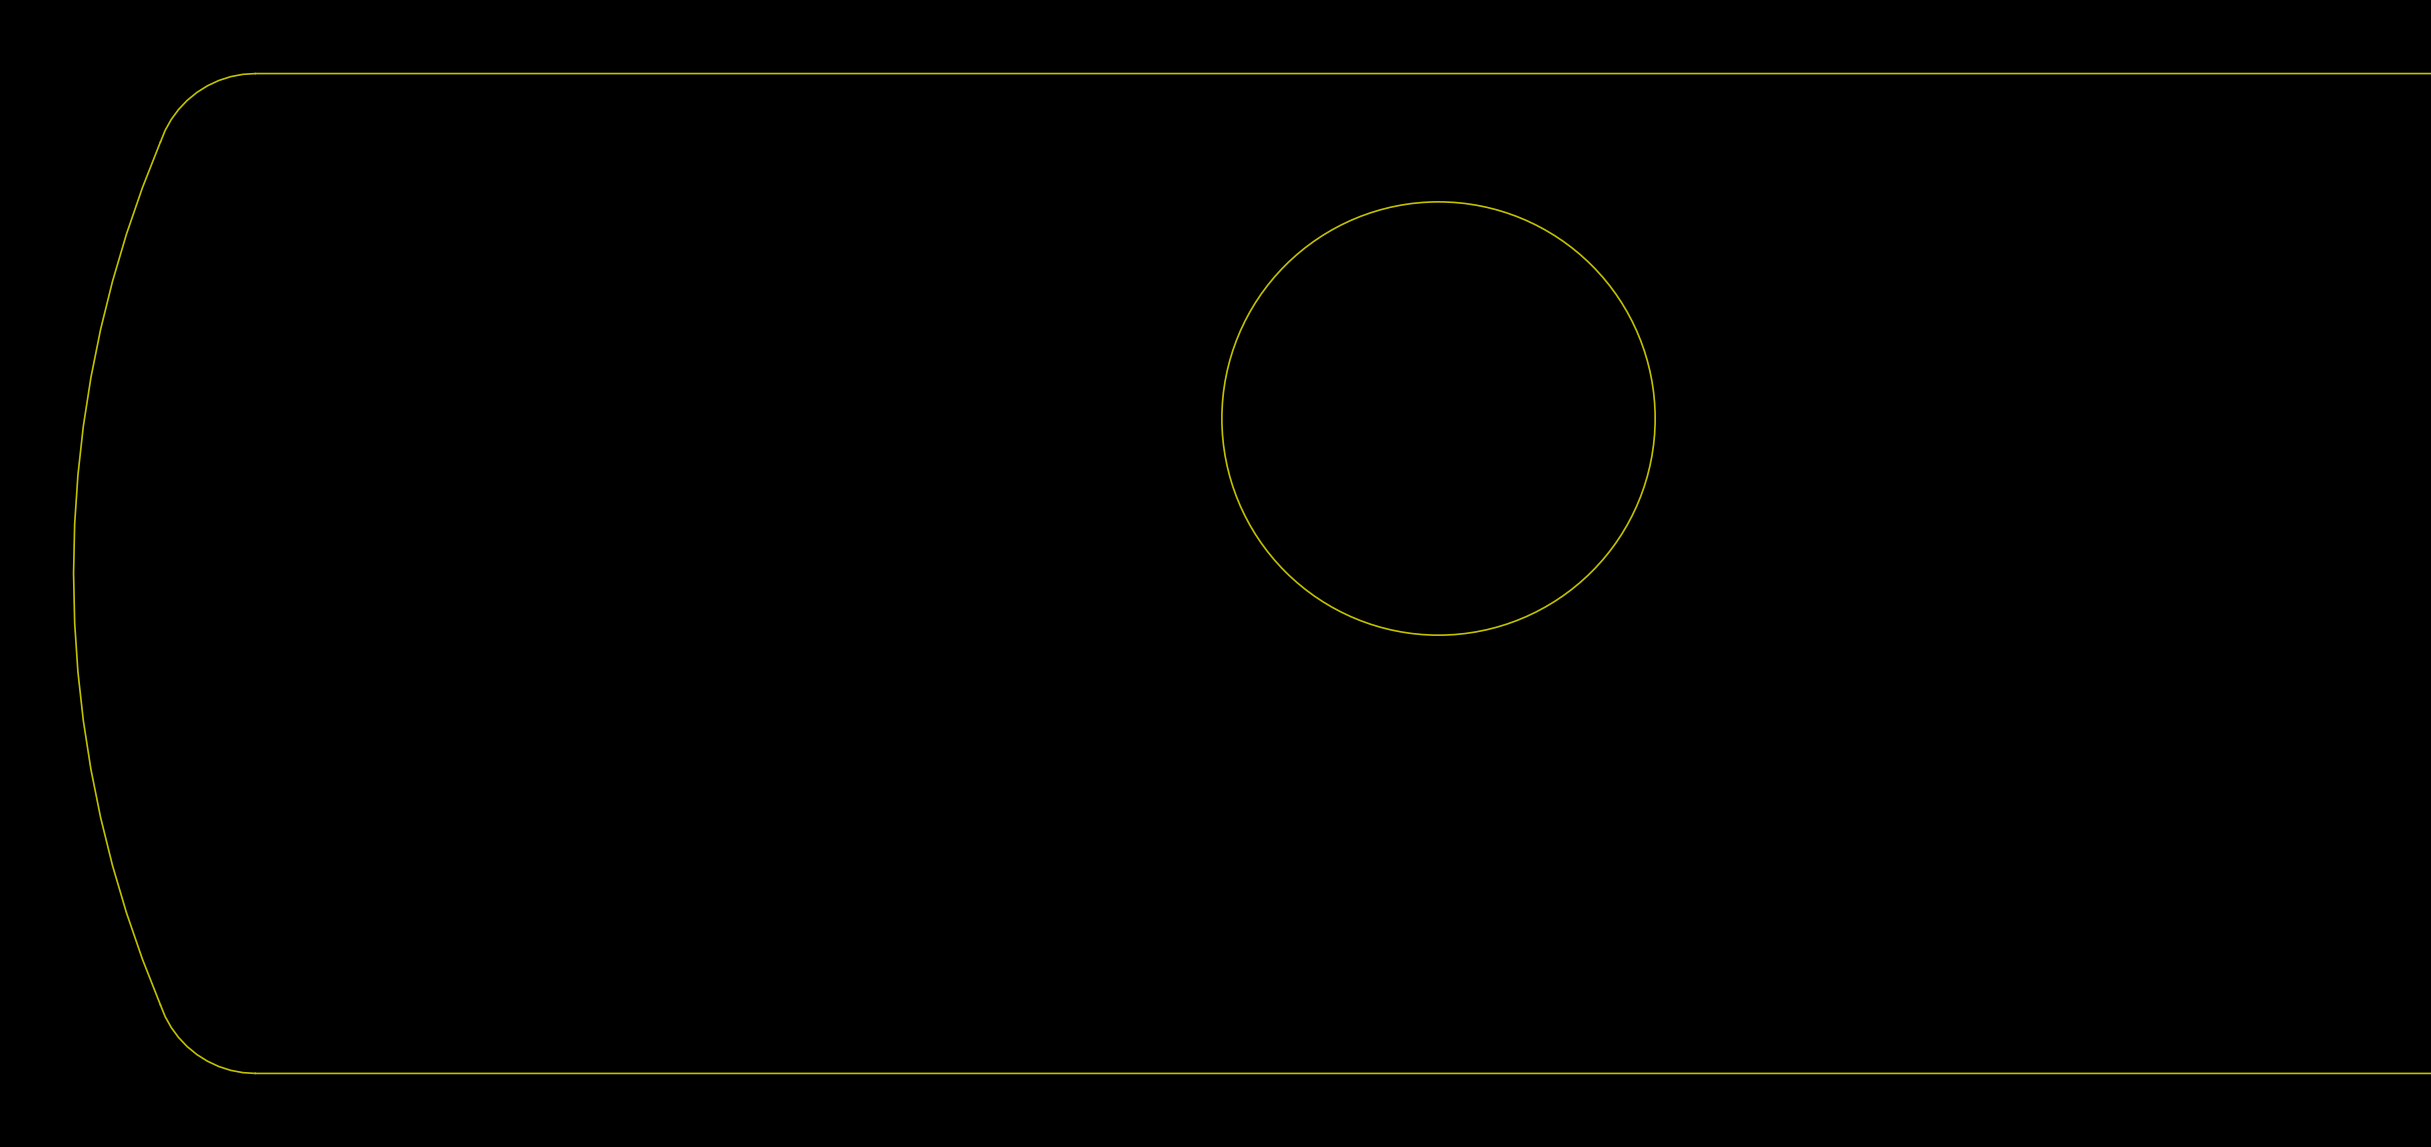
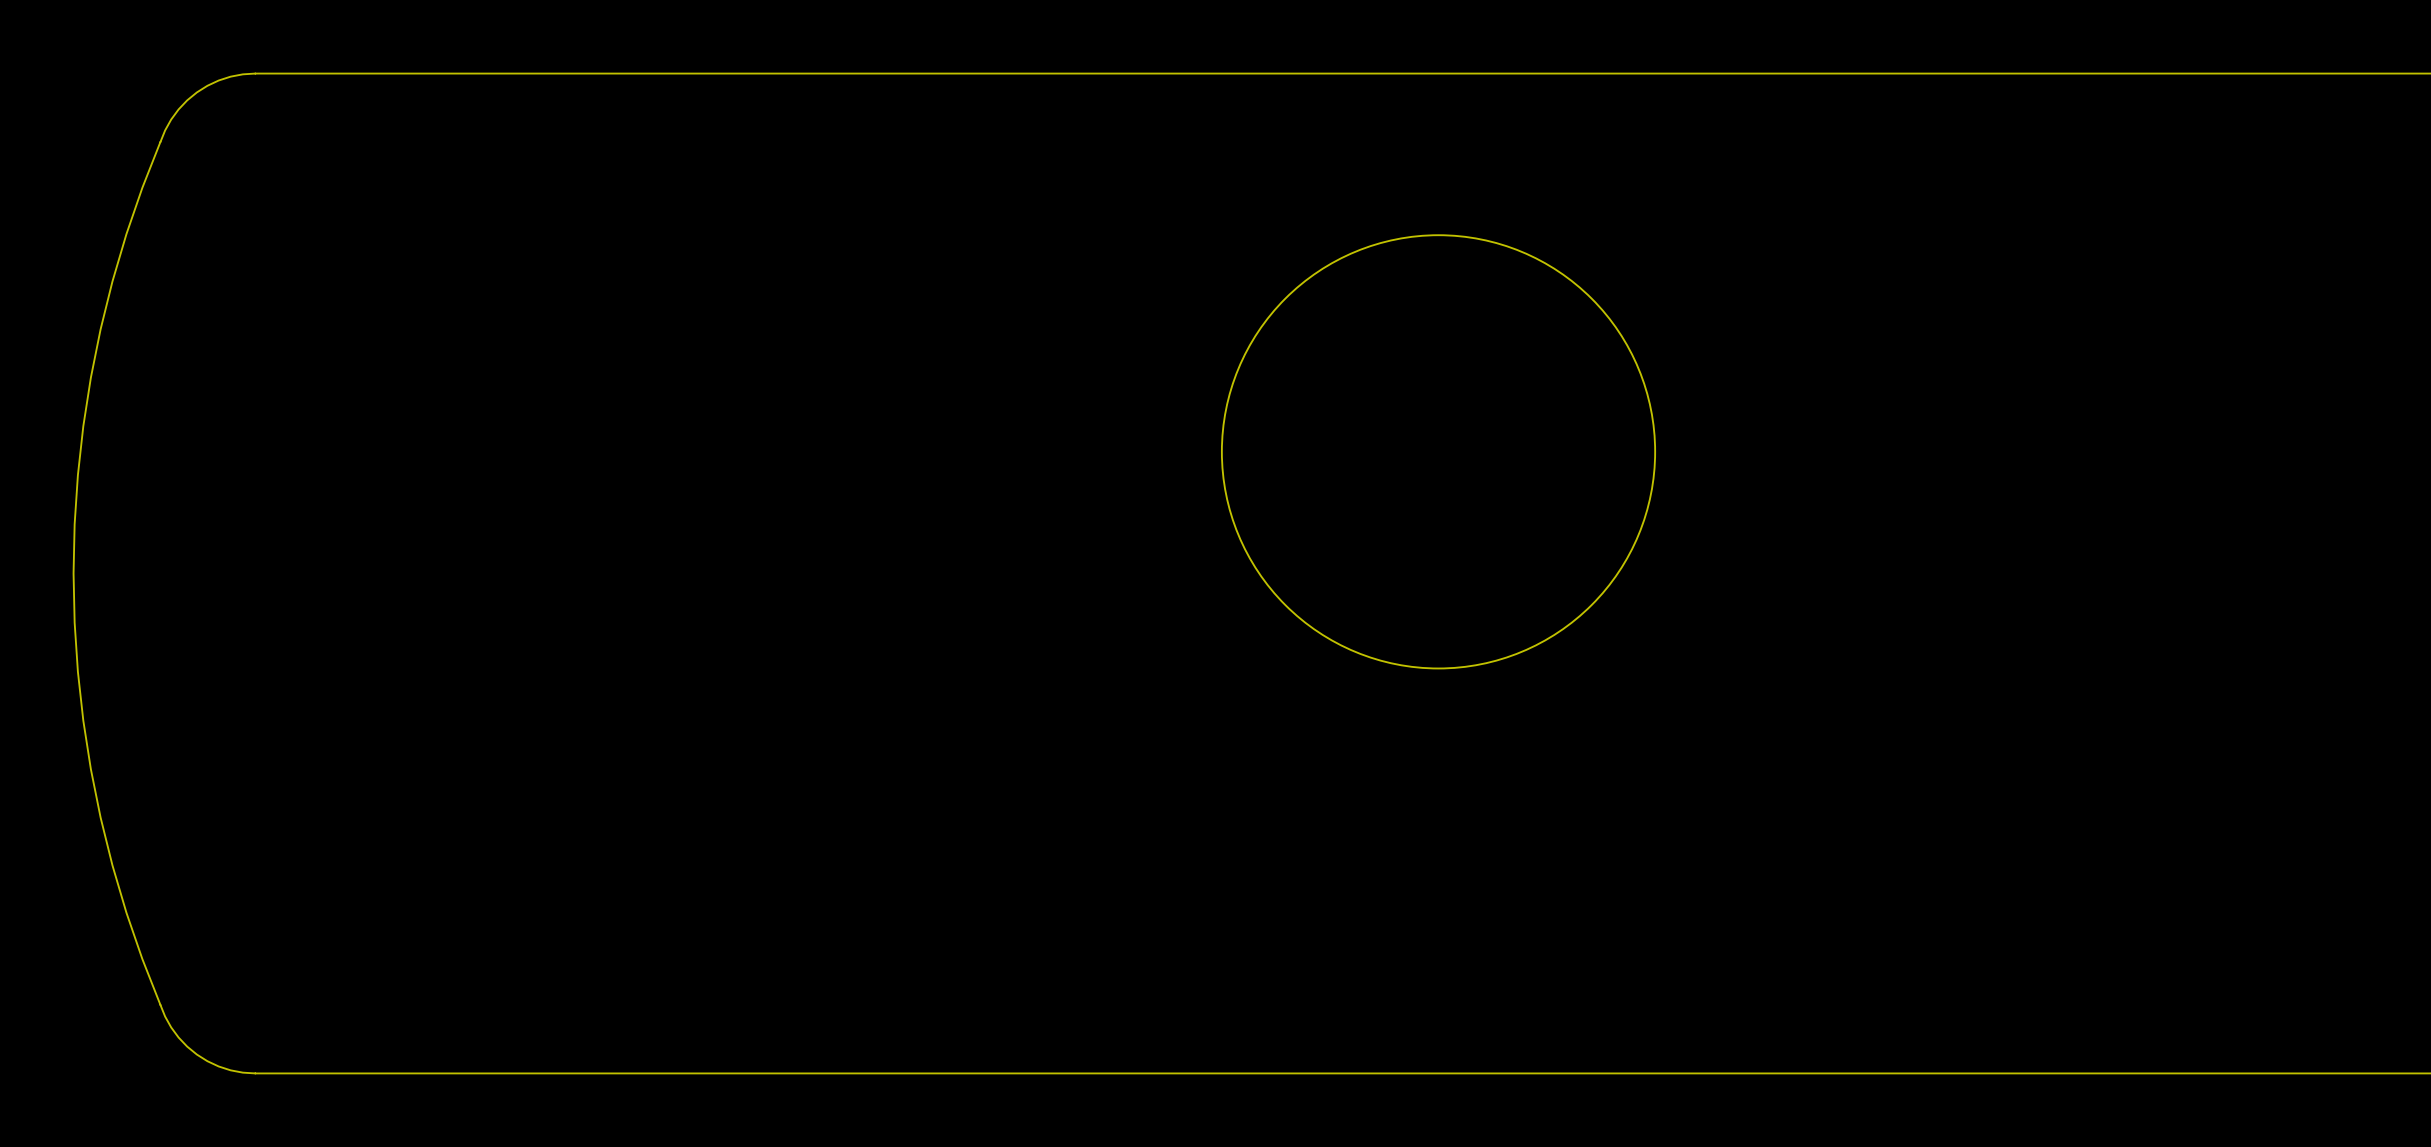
round board edge position: (1438, 418) -> (1438, 451)

